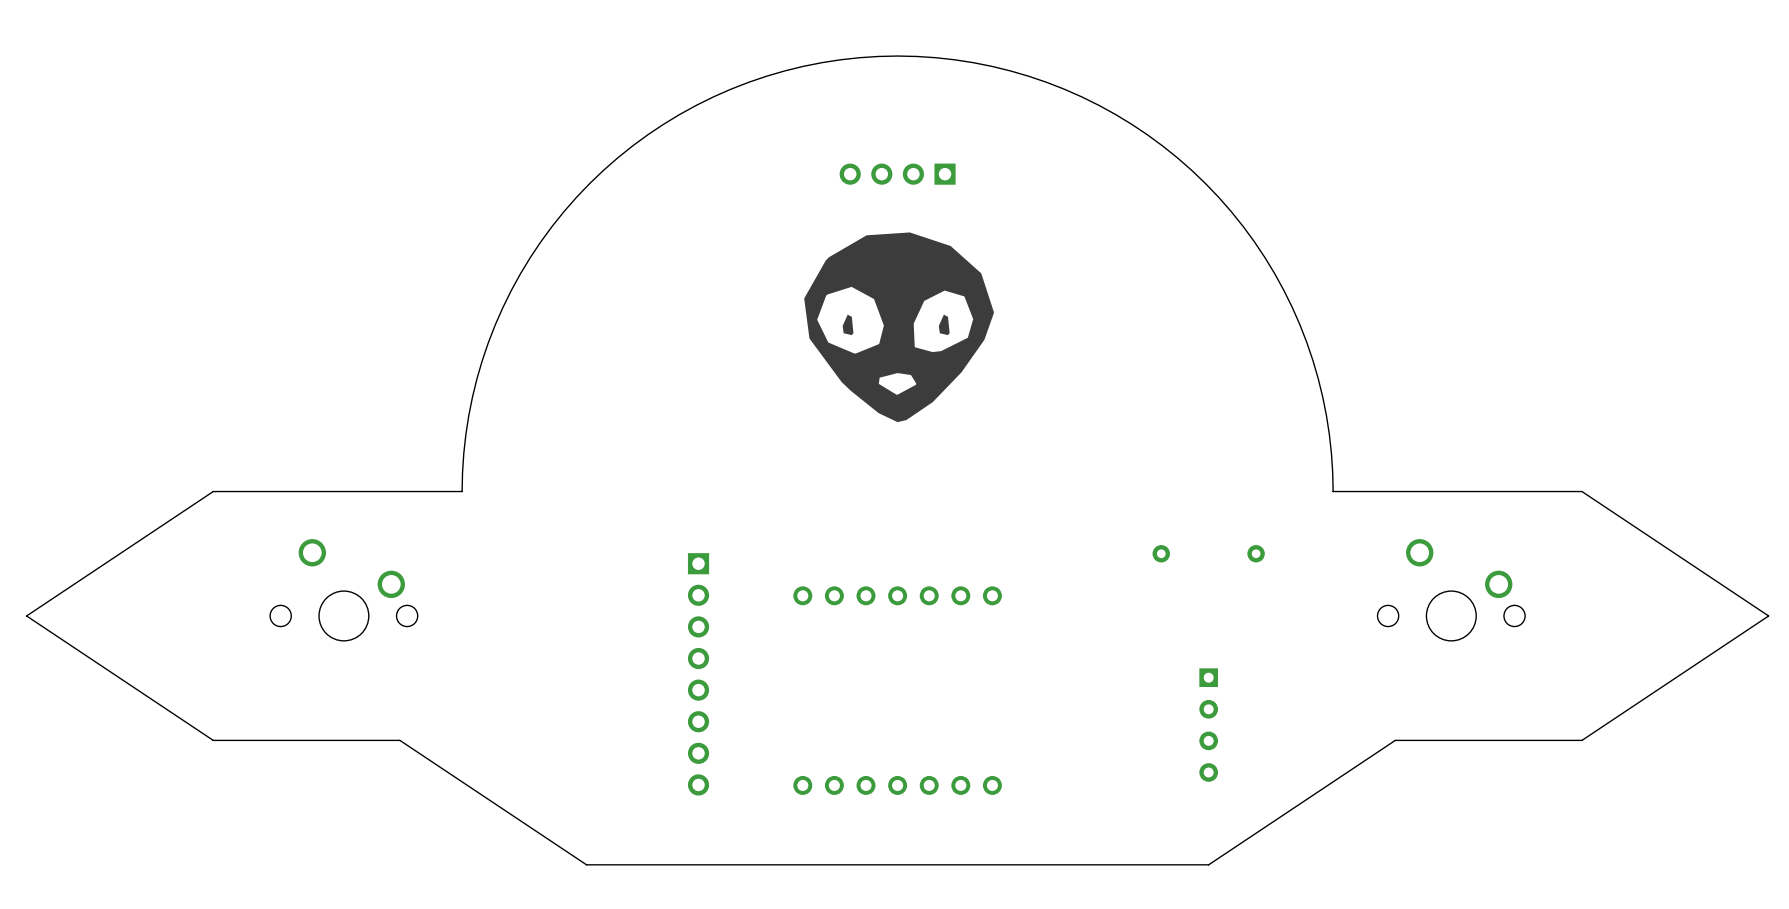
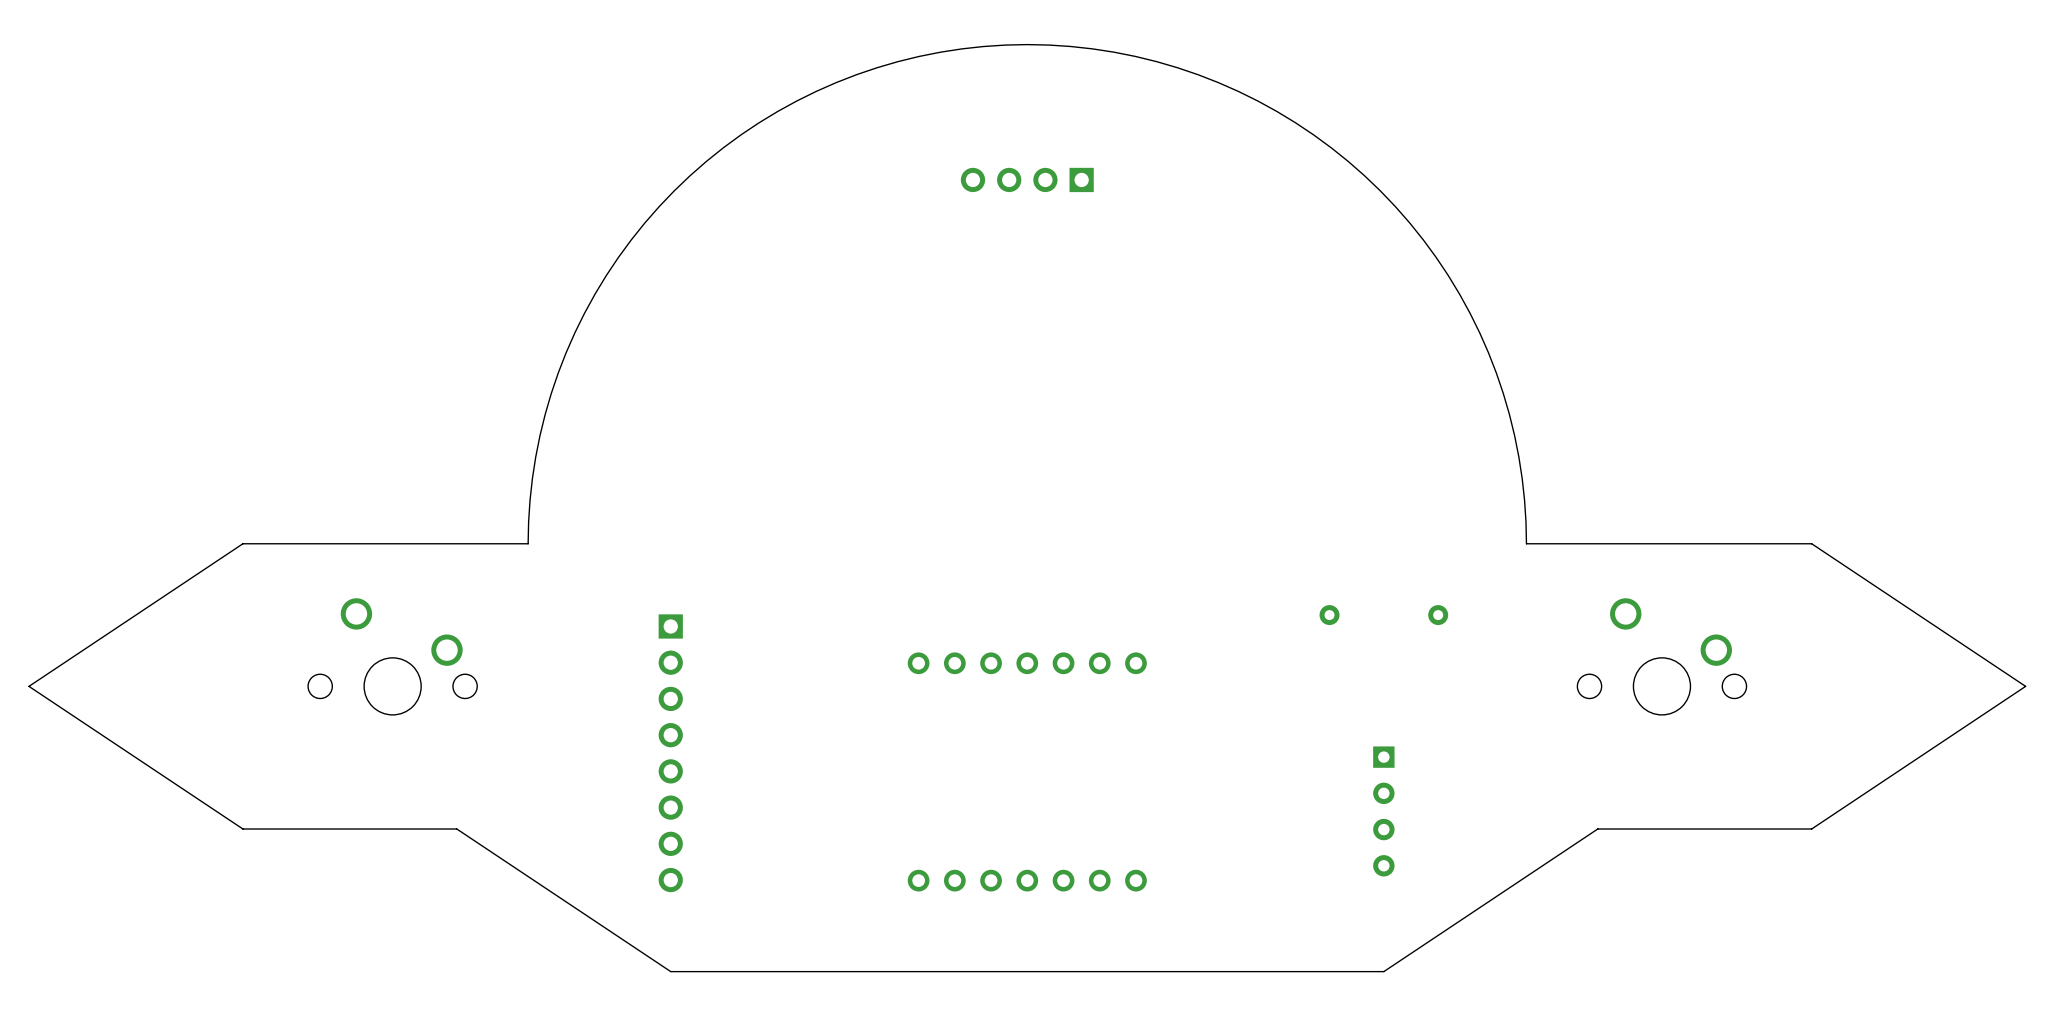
drawing: [804, 232, 994, 423] -> none
part position: (698, 674) -> (670, 753)

